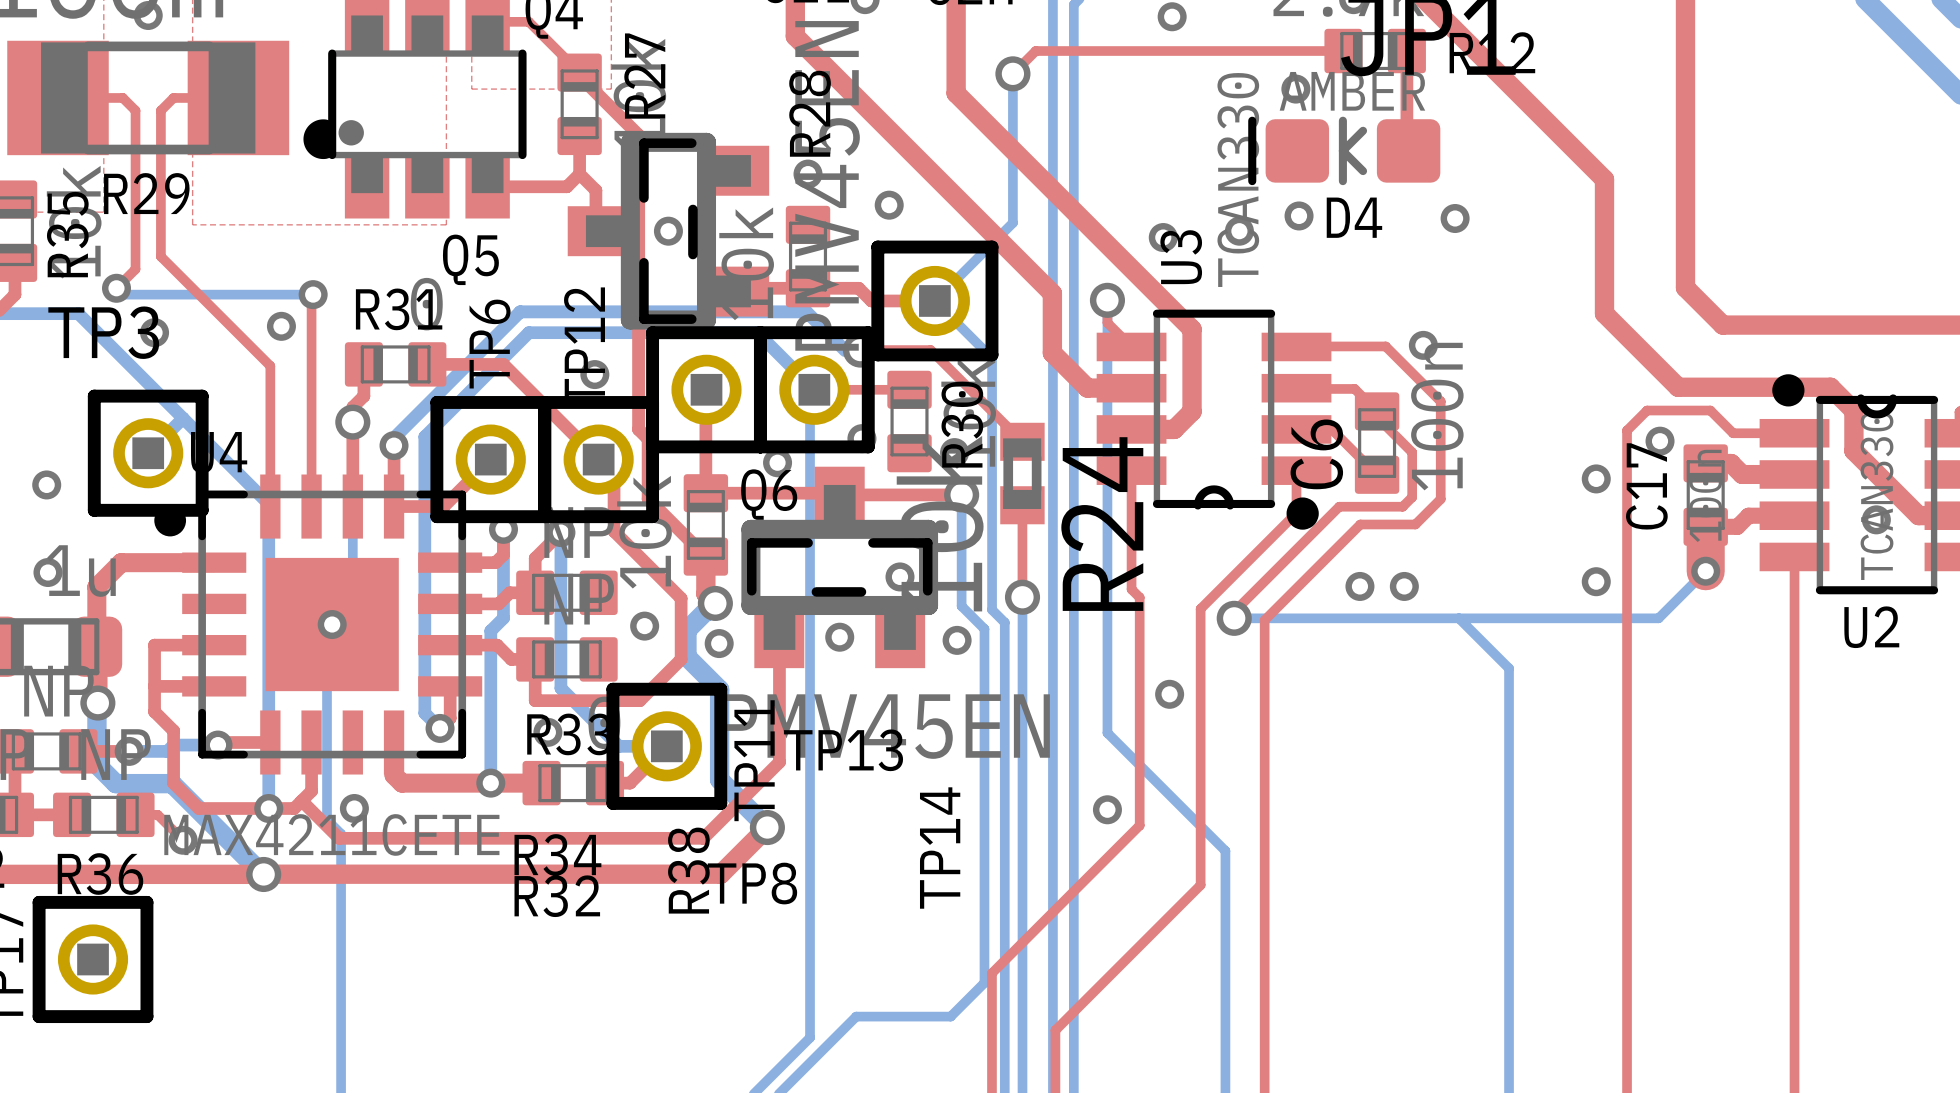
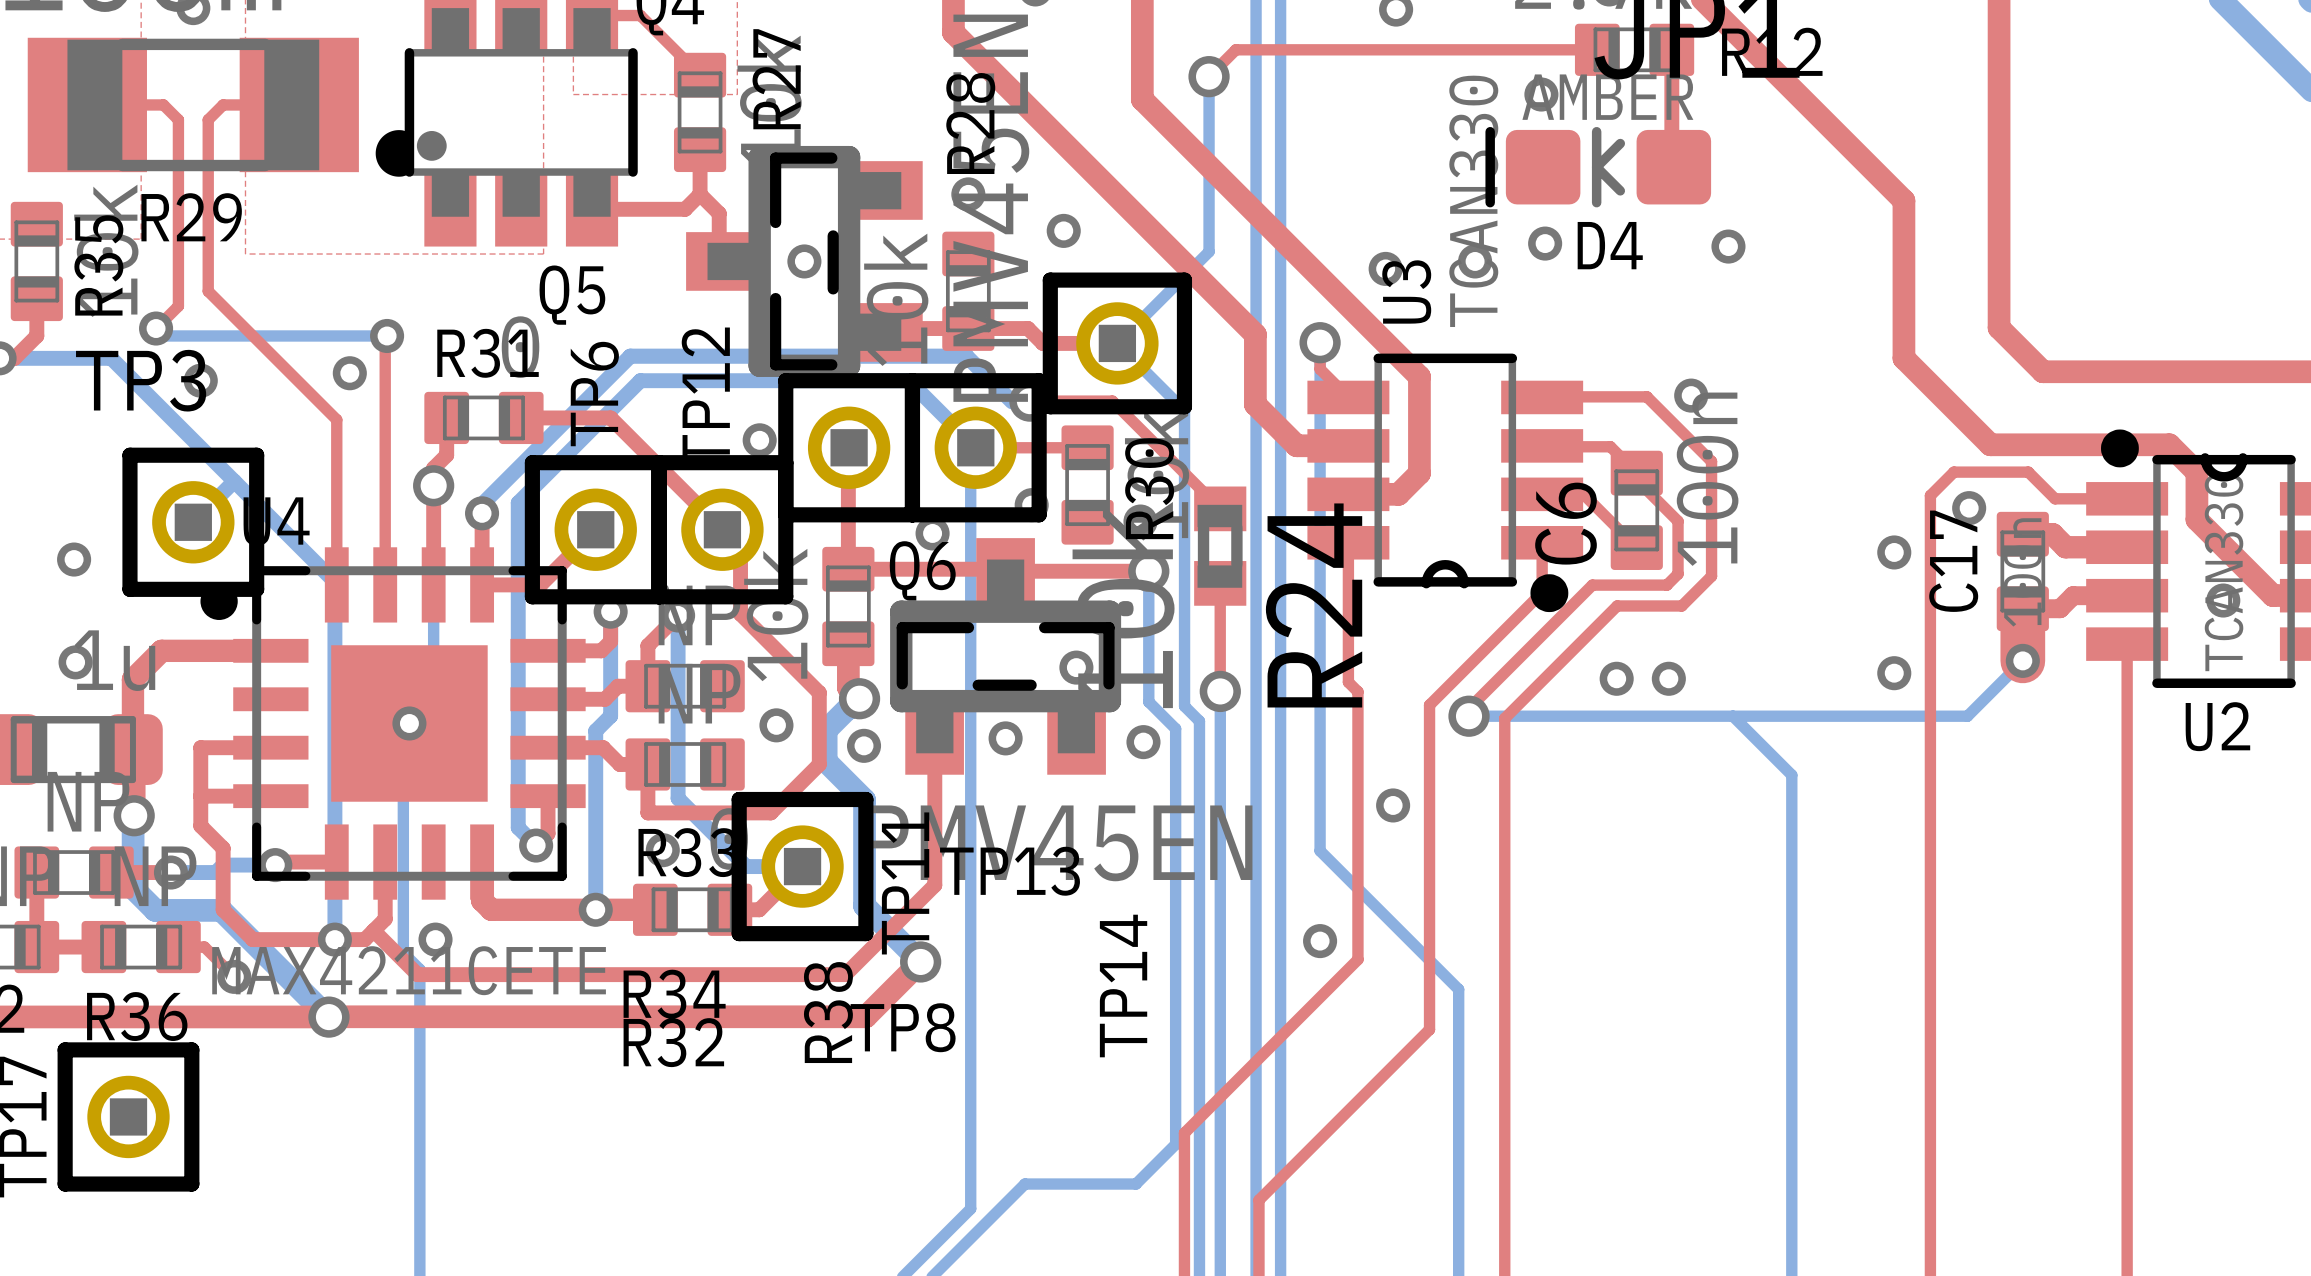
top track: (579, 72) (579, 76) (638, 135) (638, 429) (648, 439) (648, 498) (705, 556) -> none
via position: (594, 374) -> (759, 440)

